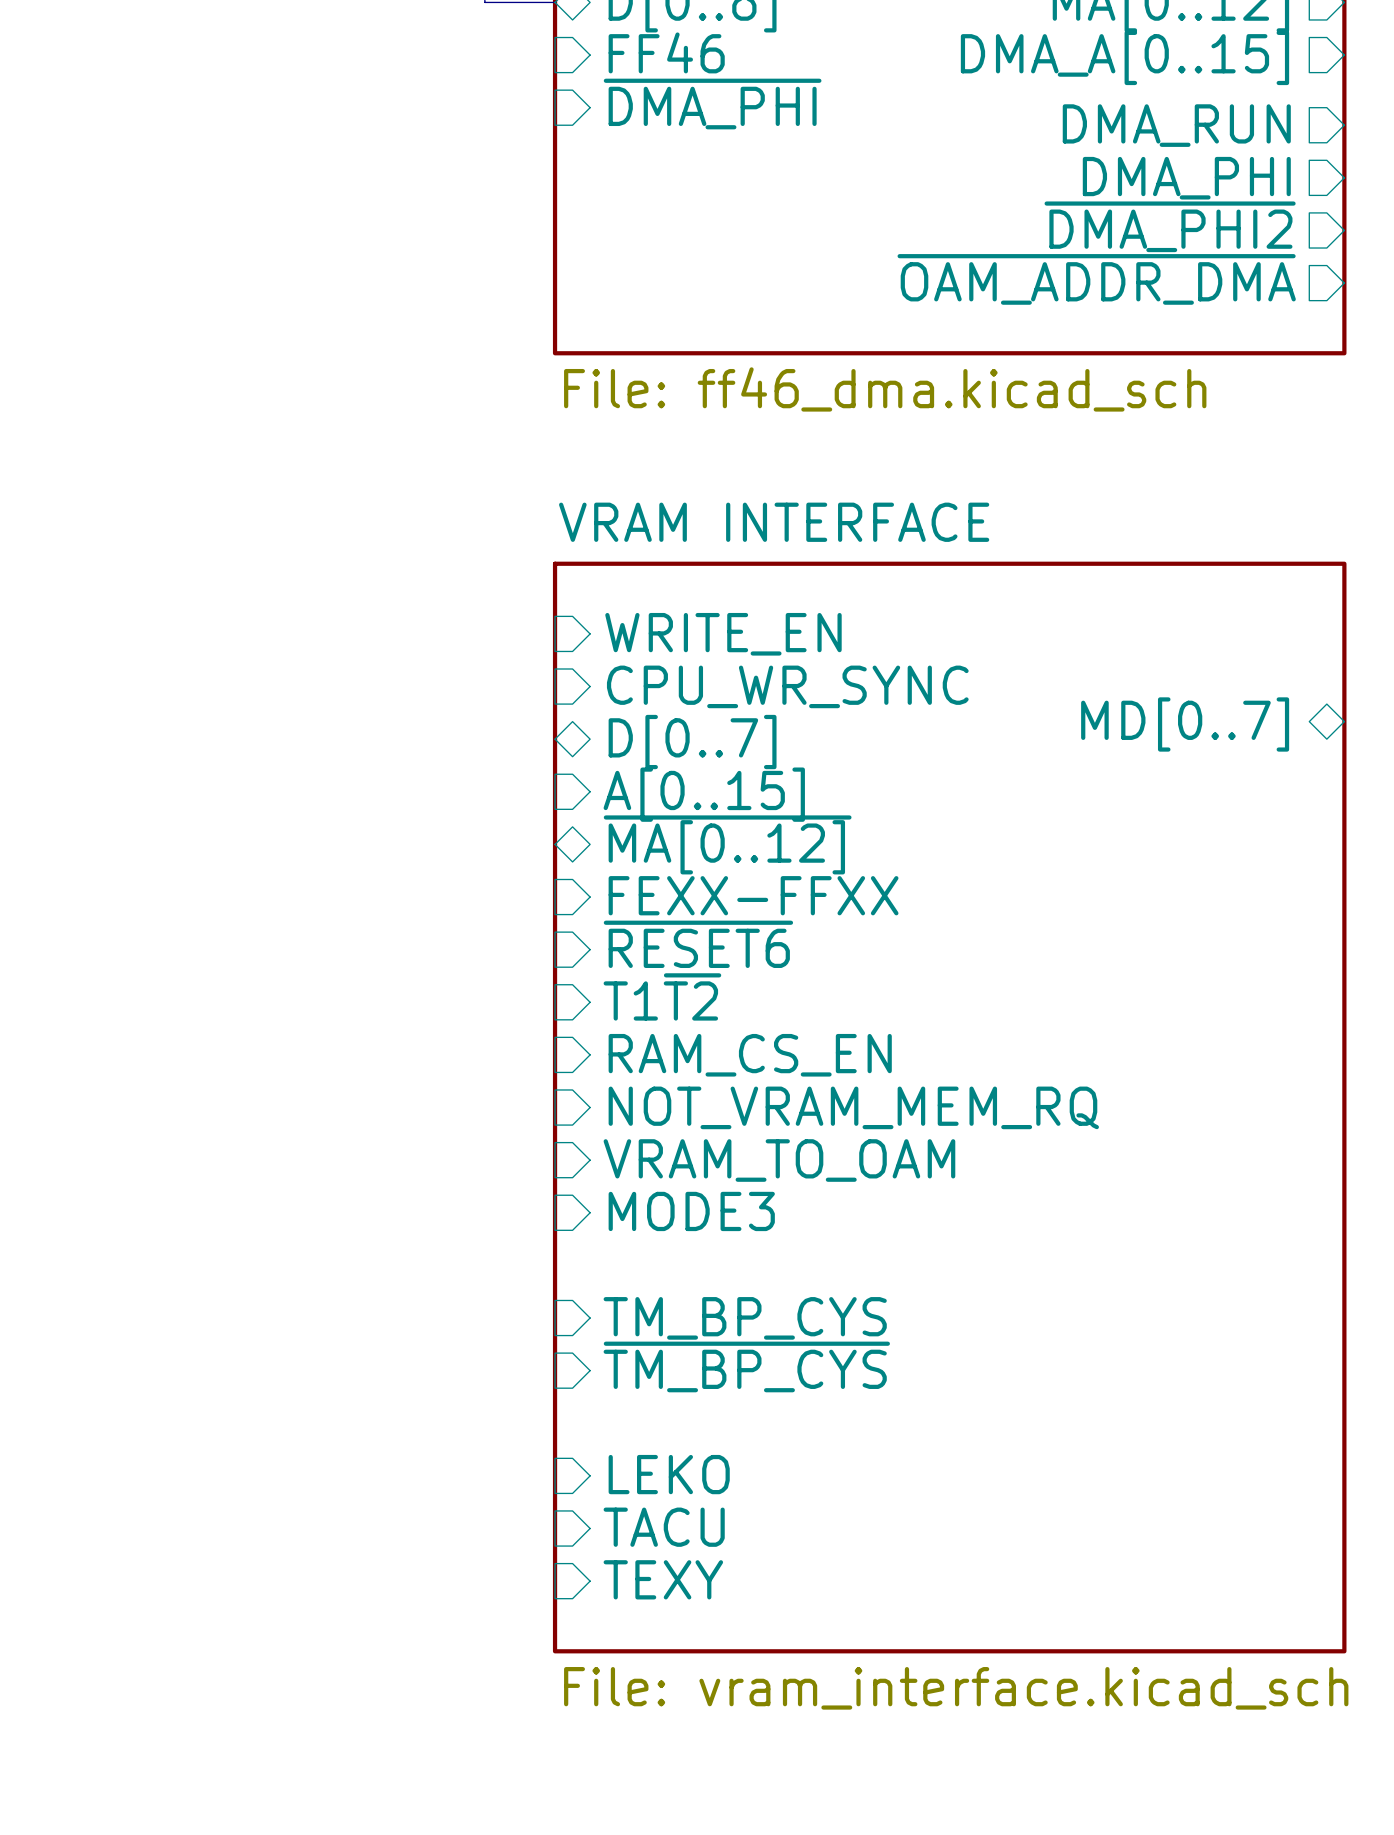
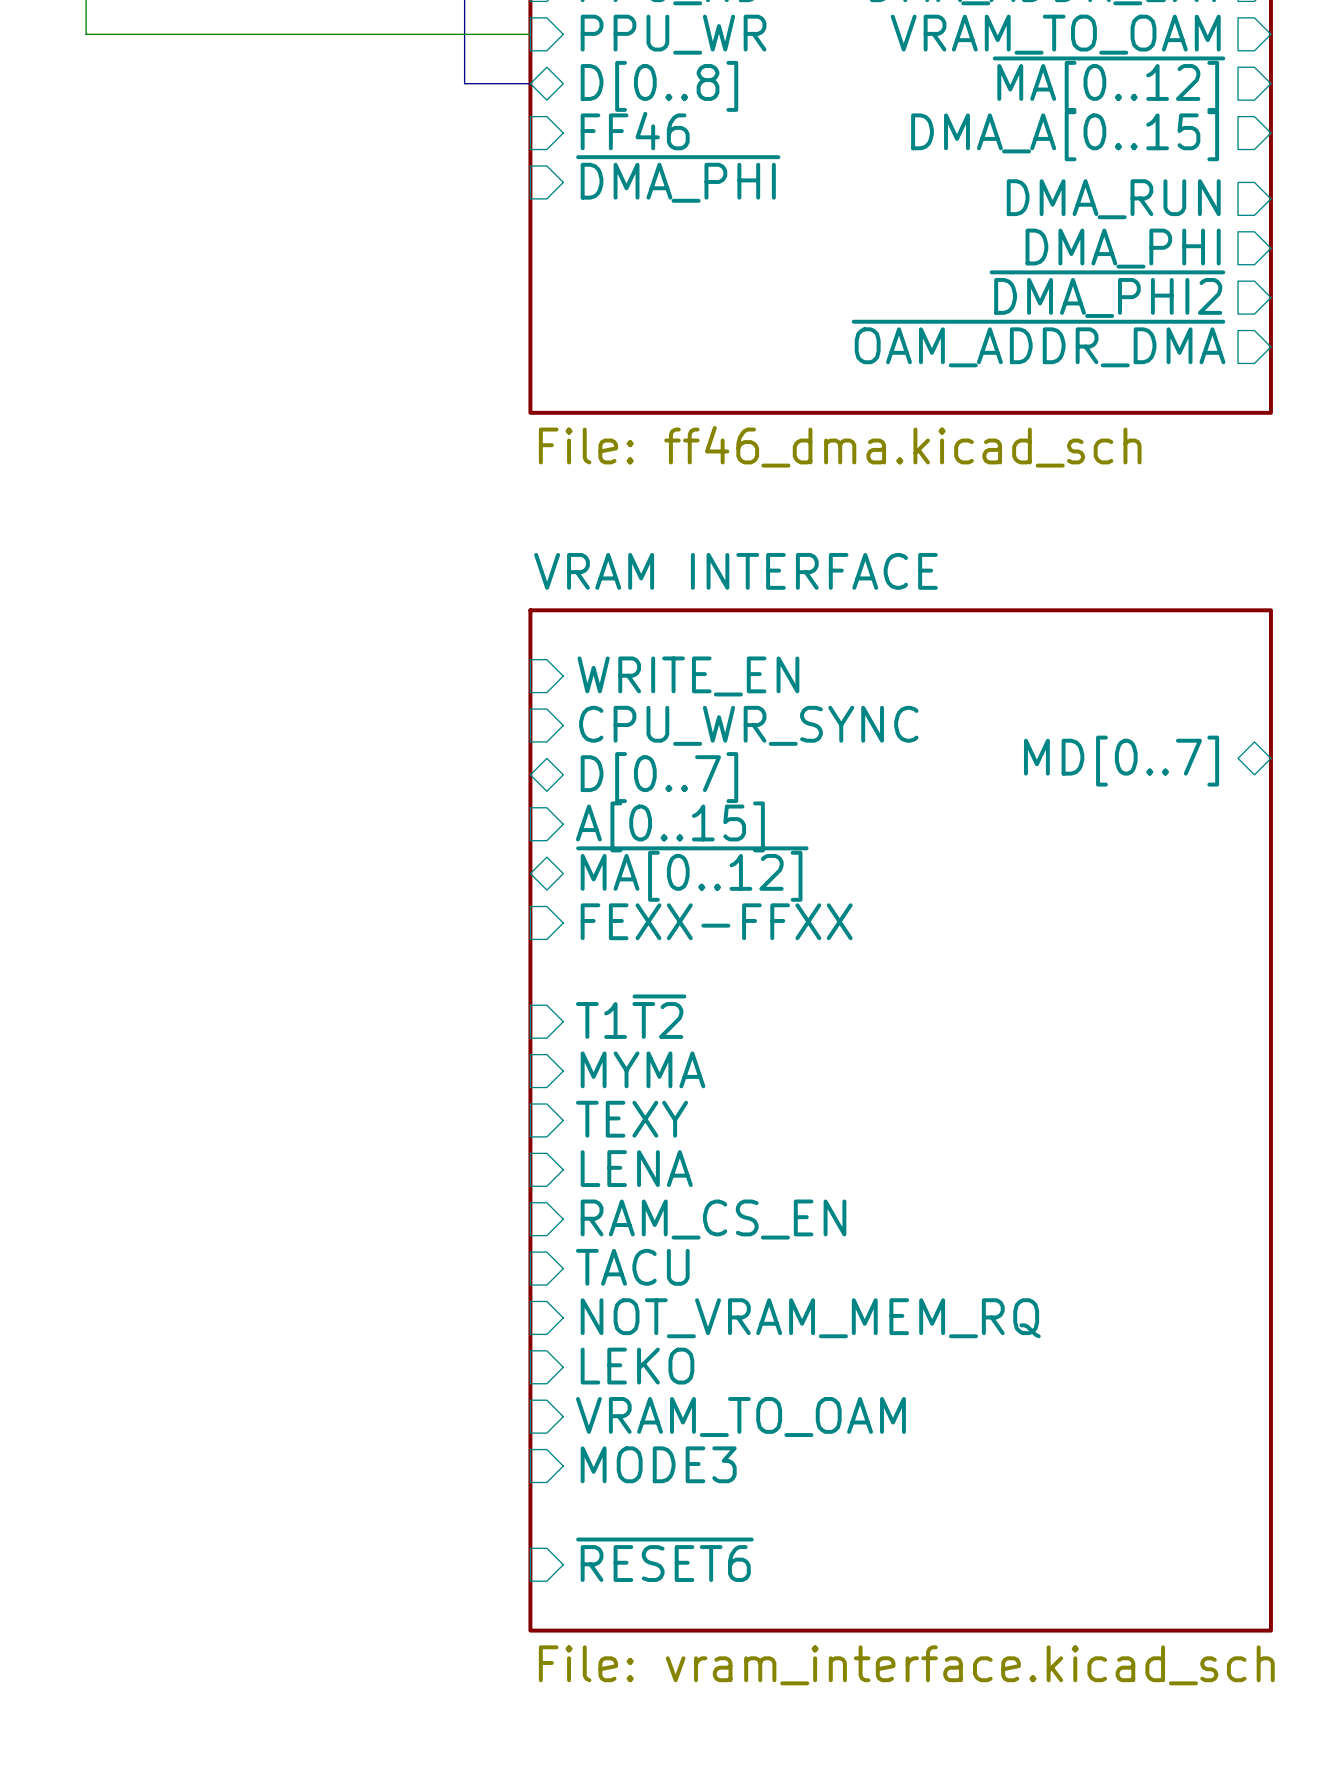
sheet pin: ~{RESET6} (698, 944) -> none
sheet pin: RAM_CS_EN (750, 1055) -> MYMA (642, 1069)
sheet pin: NOT_VRAM_MEM_RQ (853, 1107) -> TEXY (632, 1119)
sheet pin: VRAM_TO_OAM (779, 1160) -> LENA (636, 1168)
sheet pin: MODE3 (691, 1211) -> RAM_CS_EN (713, 1219)
sheet pin: TM_BP_CYS (745, 1318) -> NOT_VRAM_MEM_RQ (810, 1318)
sheet pin: ~{TM_BP_CYS} (746, 1366) -> LEKO (637, 1366)
sheet pin: none -> VRAM_TO_OAM (740, 1417)
sheet pin: LEKO (669, 1474) -> MODE3 (658, 1464)
sheet pin position: TACU (664, 1527) -> TACU (632, 1267)
sheet pin: TEXY (663, 1579) -> ~{RESET6} (664, 1559)

